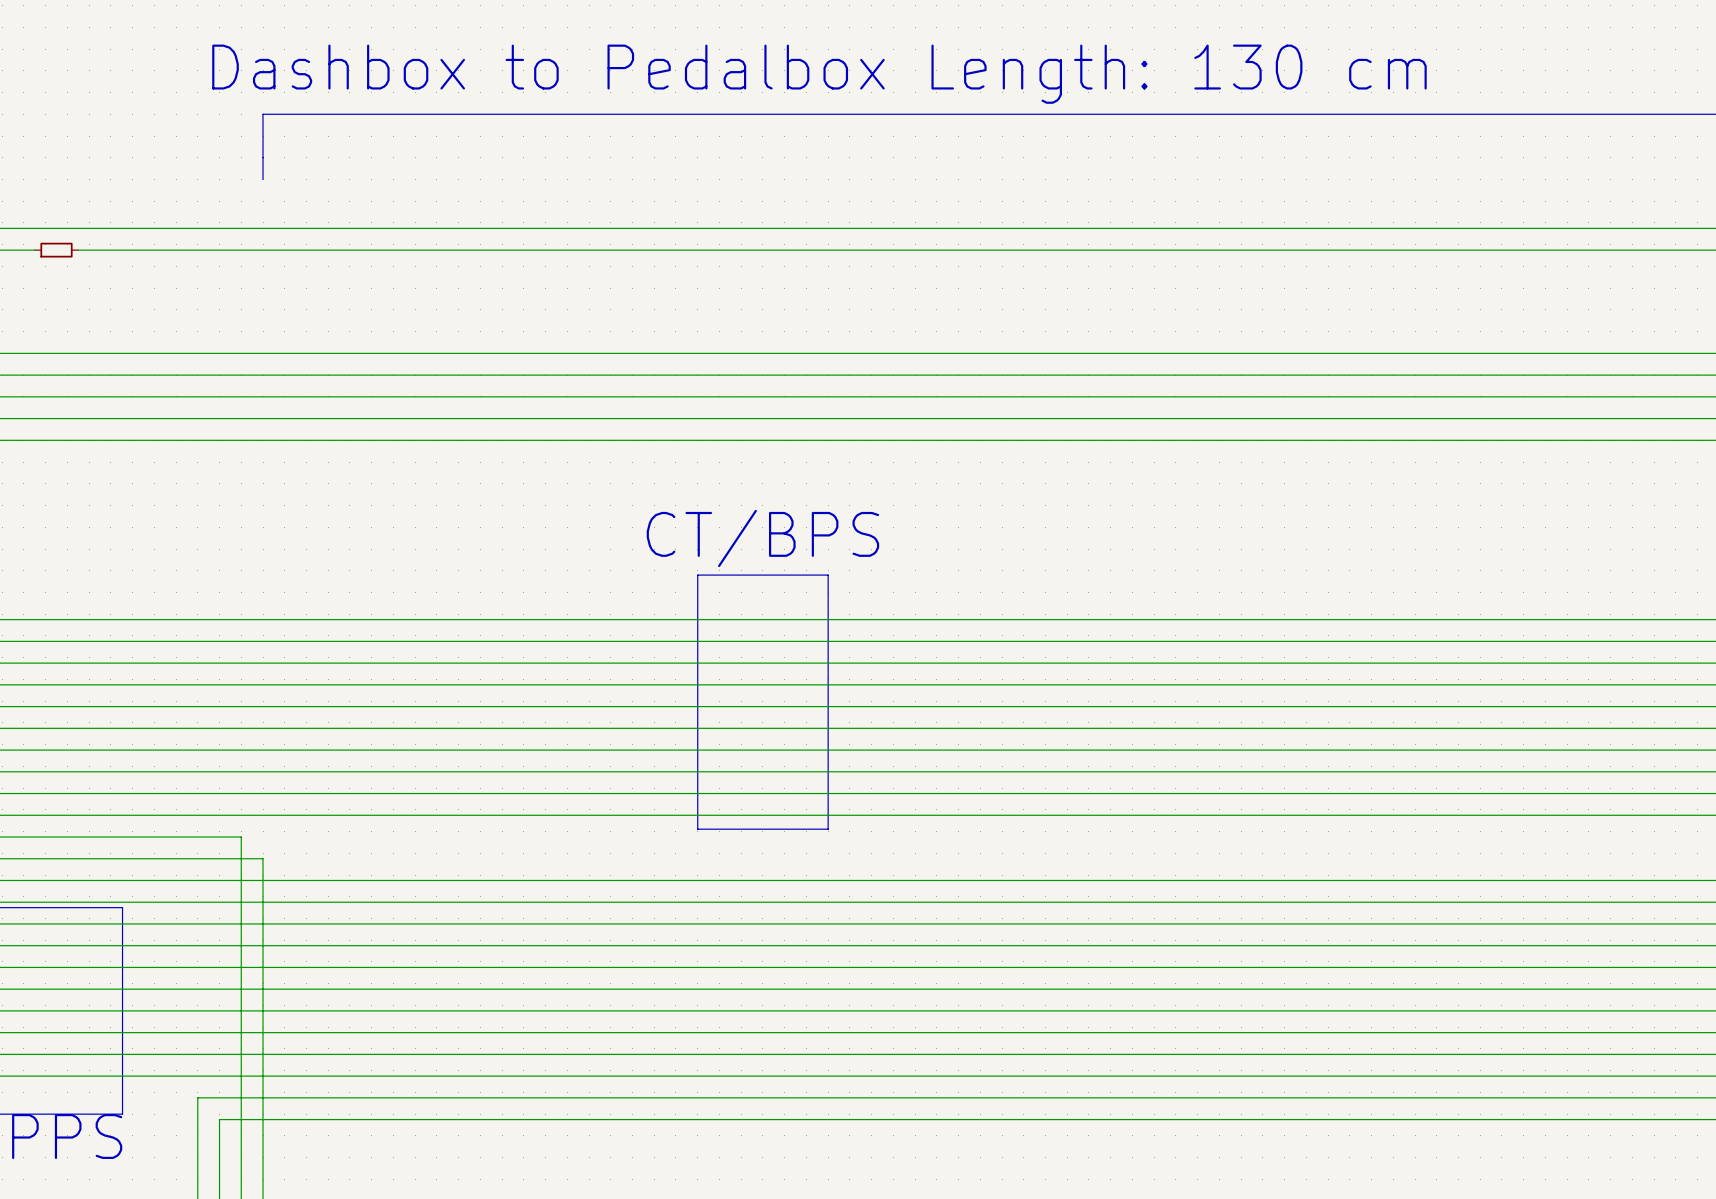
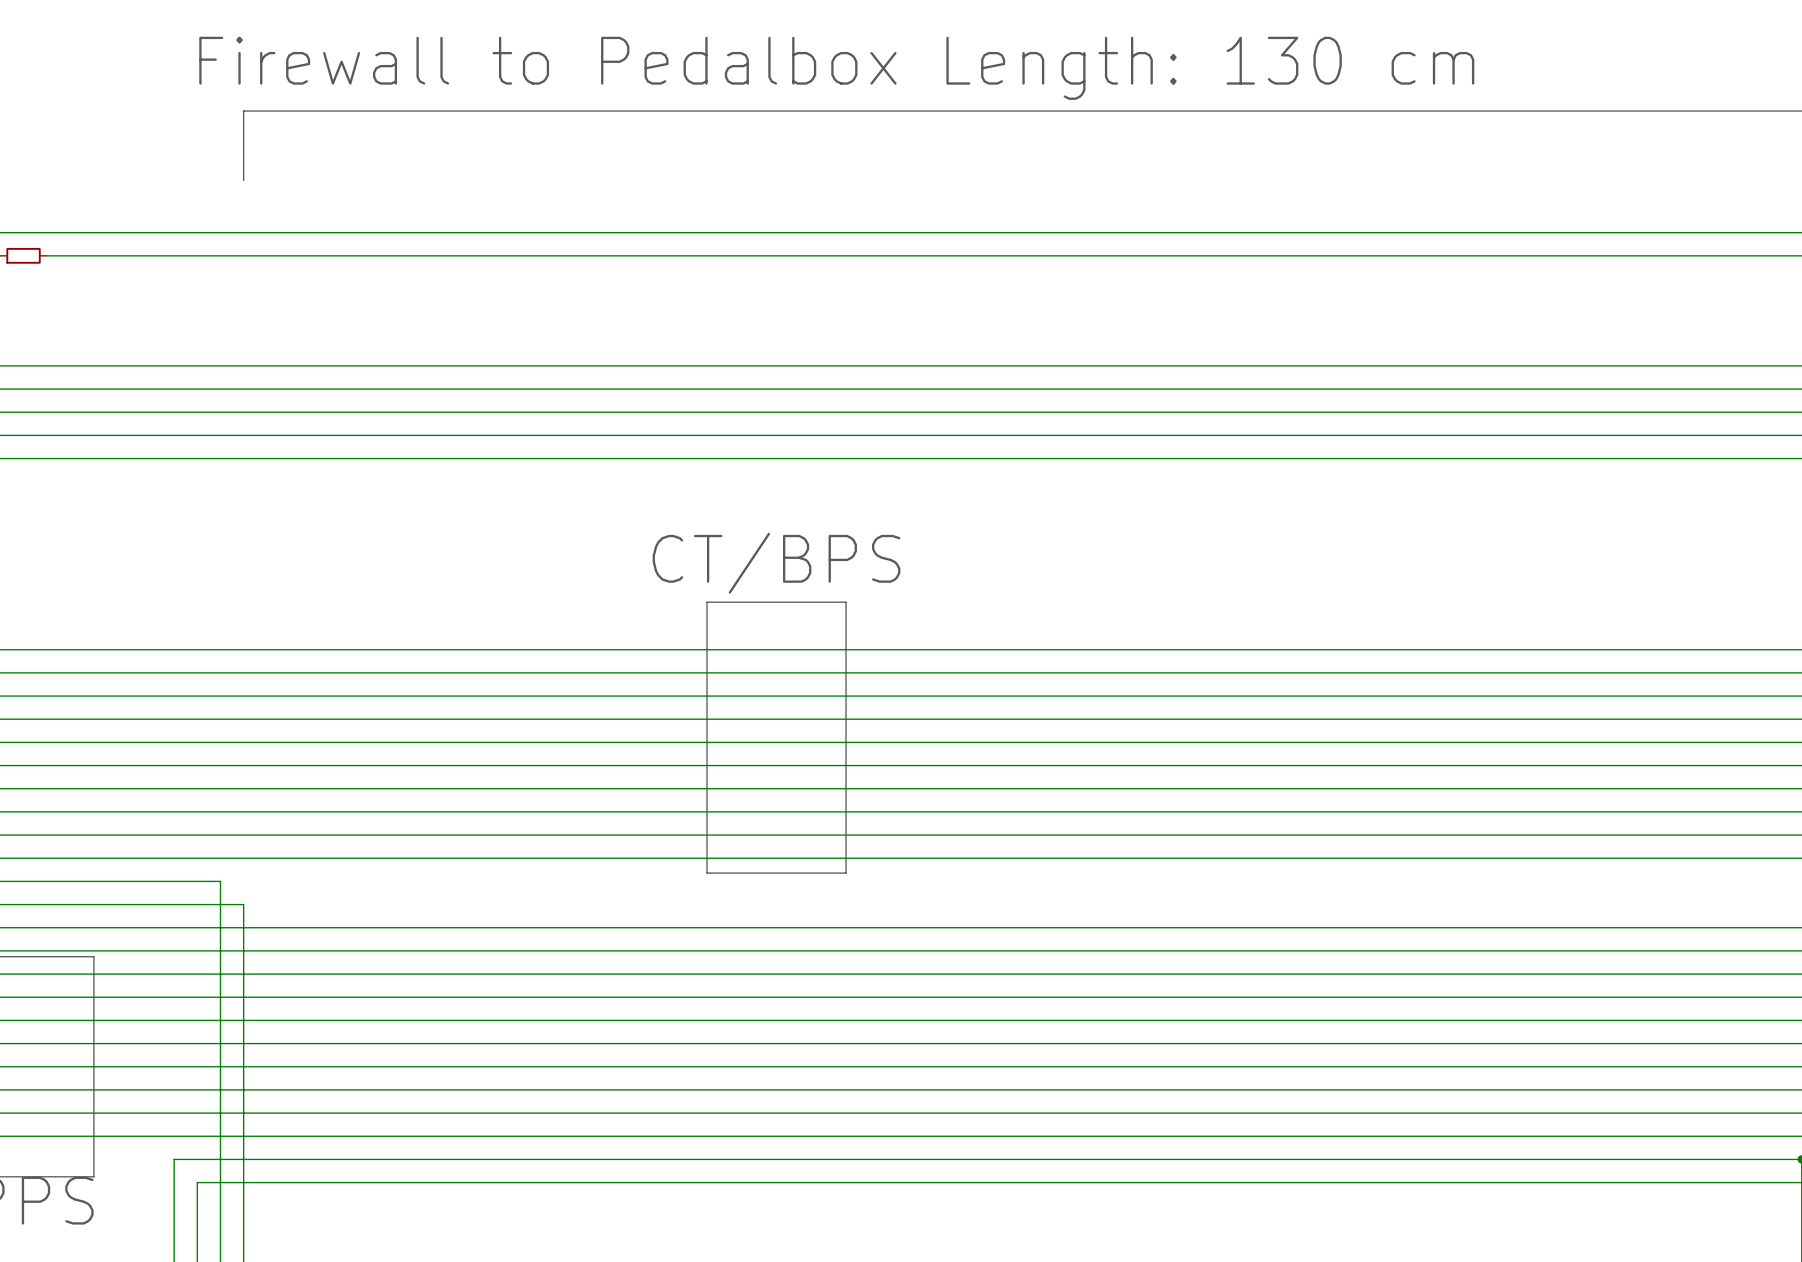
text: Dashbox to Pedalbox Length: 130 cm (819, 74) -> Firewall to Pedalbox Length: 130 cm (836, 68)

